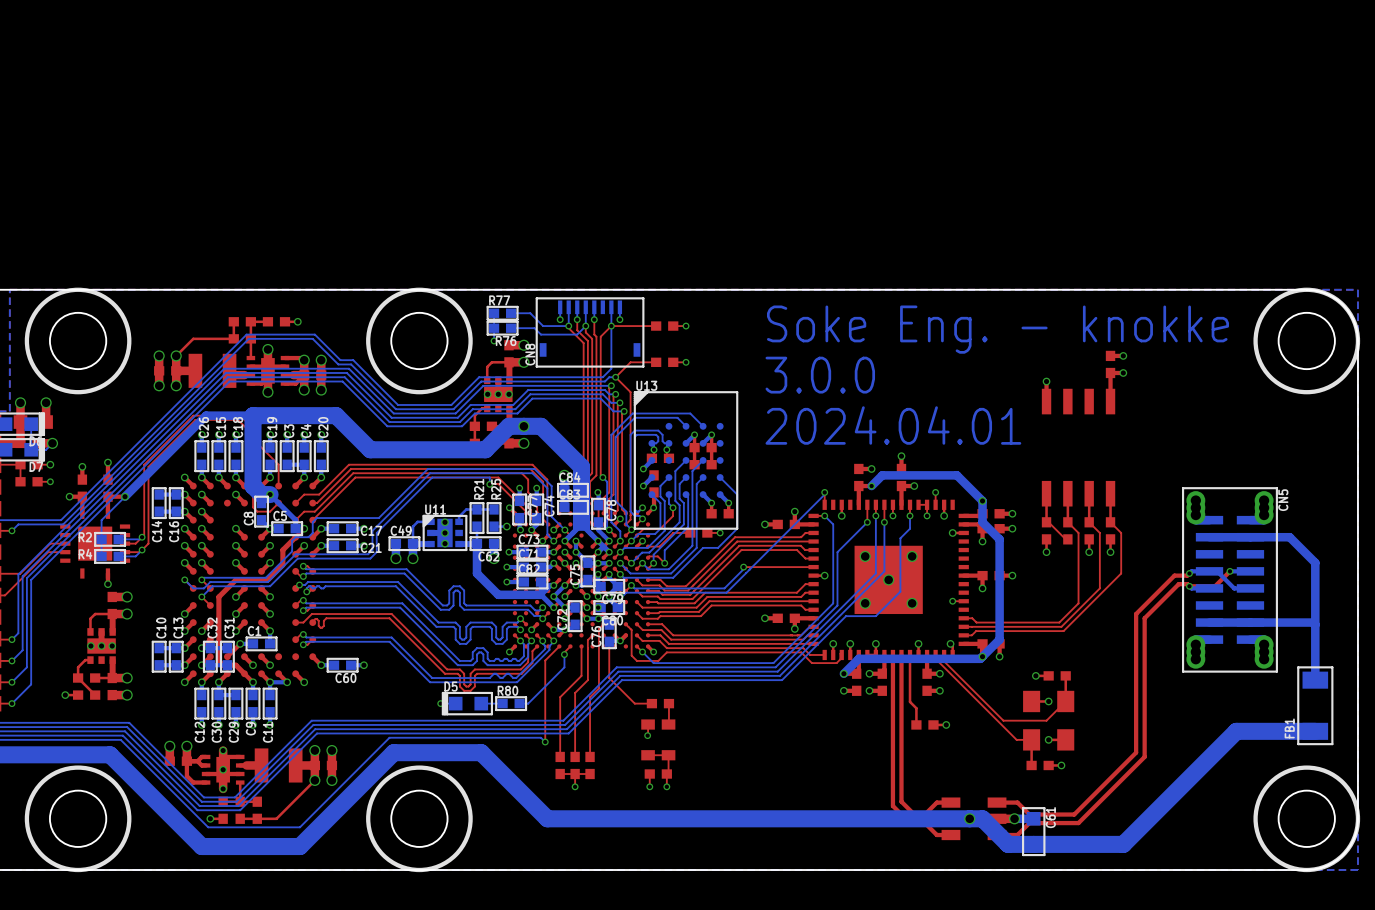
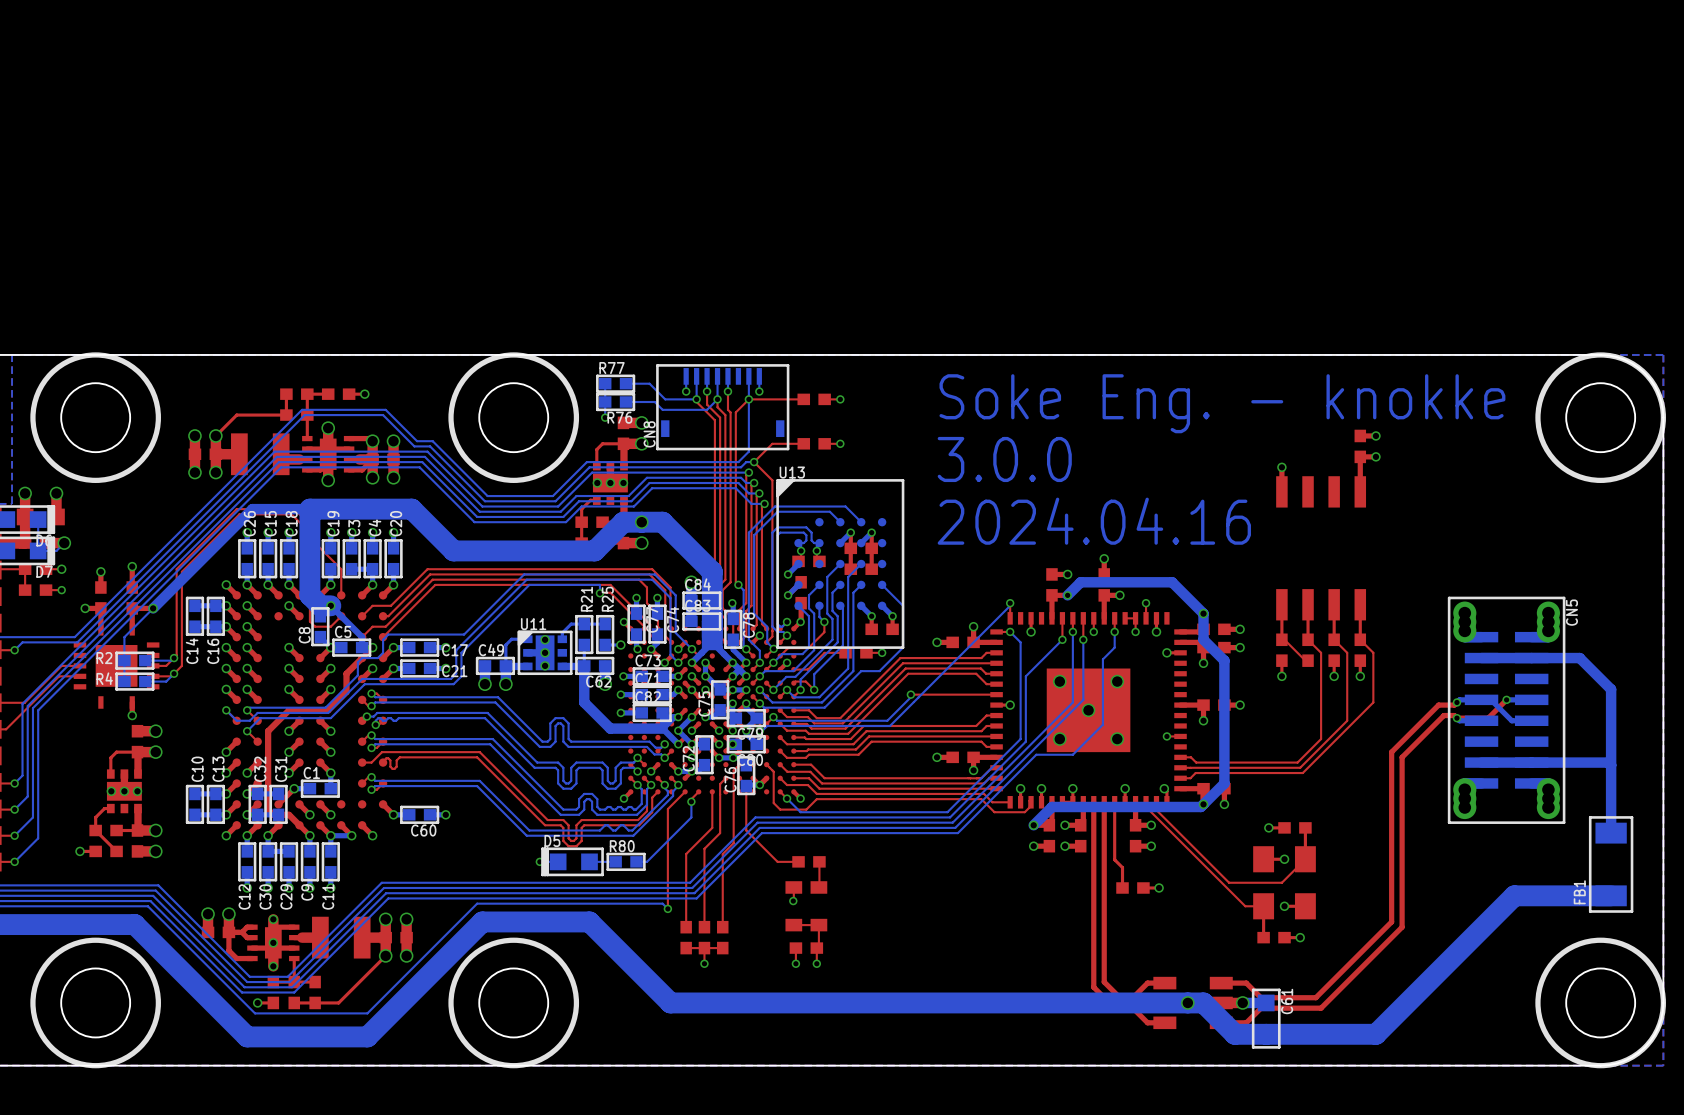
text: 2024.04.01 (893, 425) -> 2024.04.16 (1094, 521)

